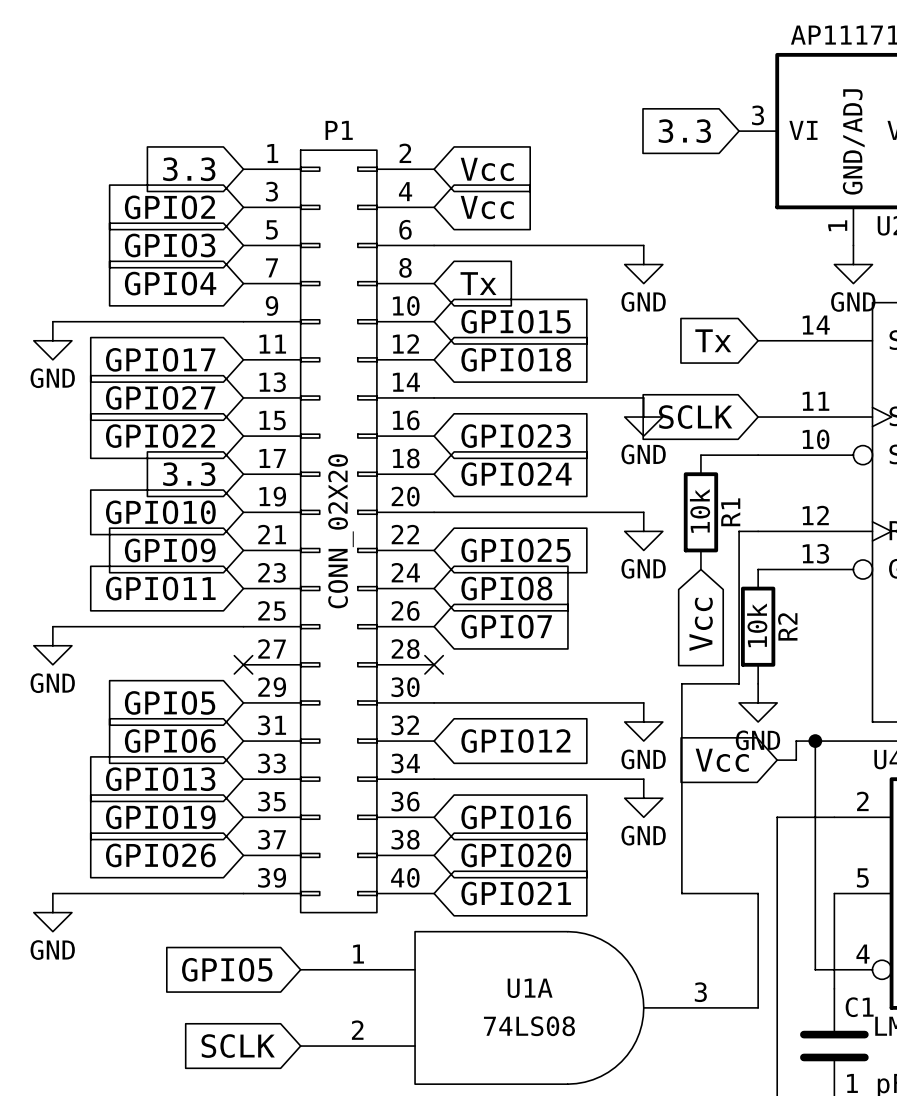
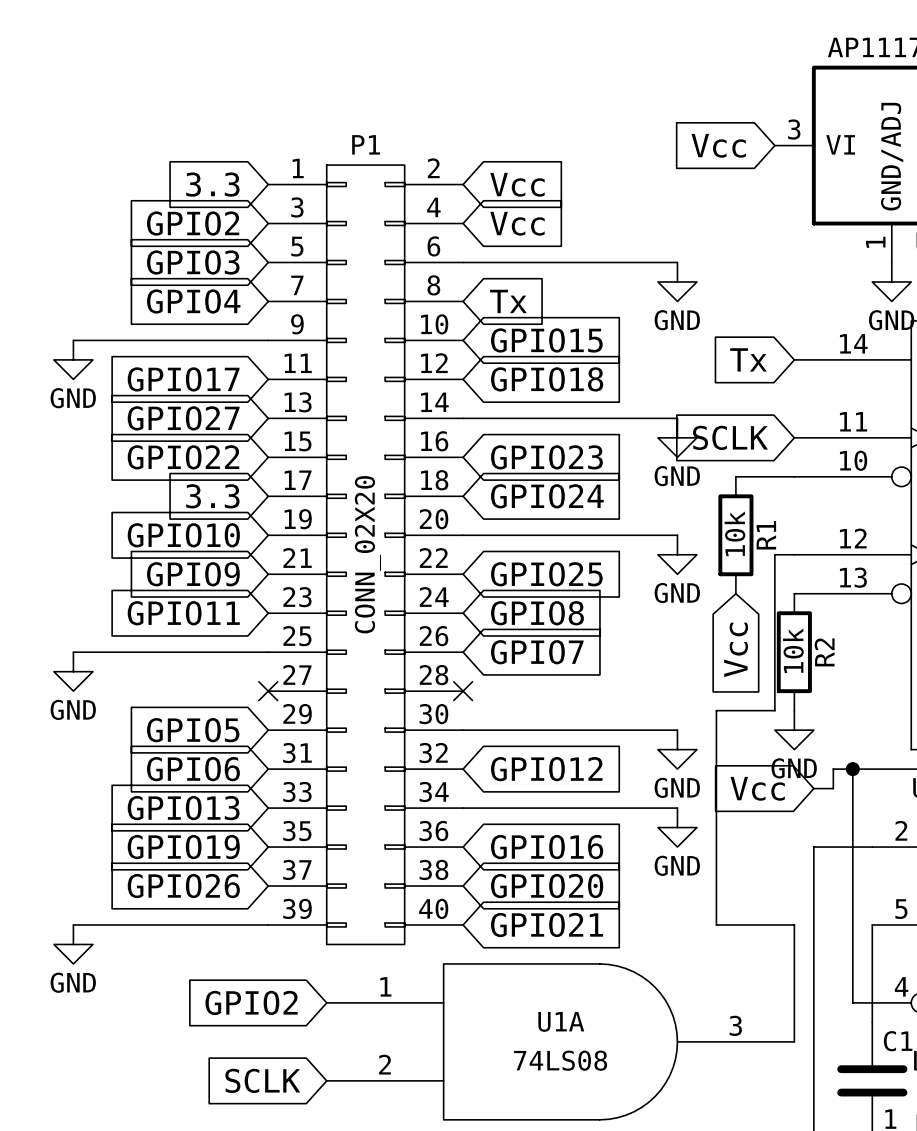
global label: 3.3 (684, 131) -> Vcc (718, 145)
global label: GPIO5 (227, 969) -> GPIO2 (251, 1002)

